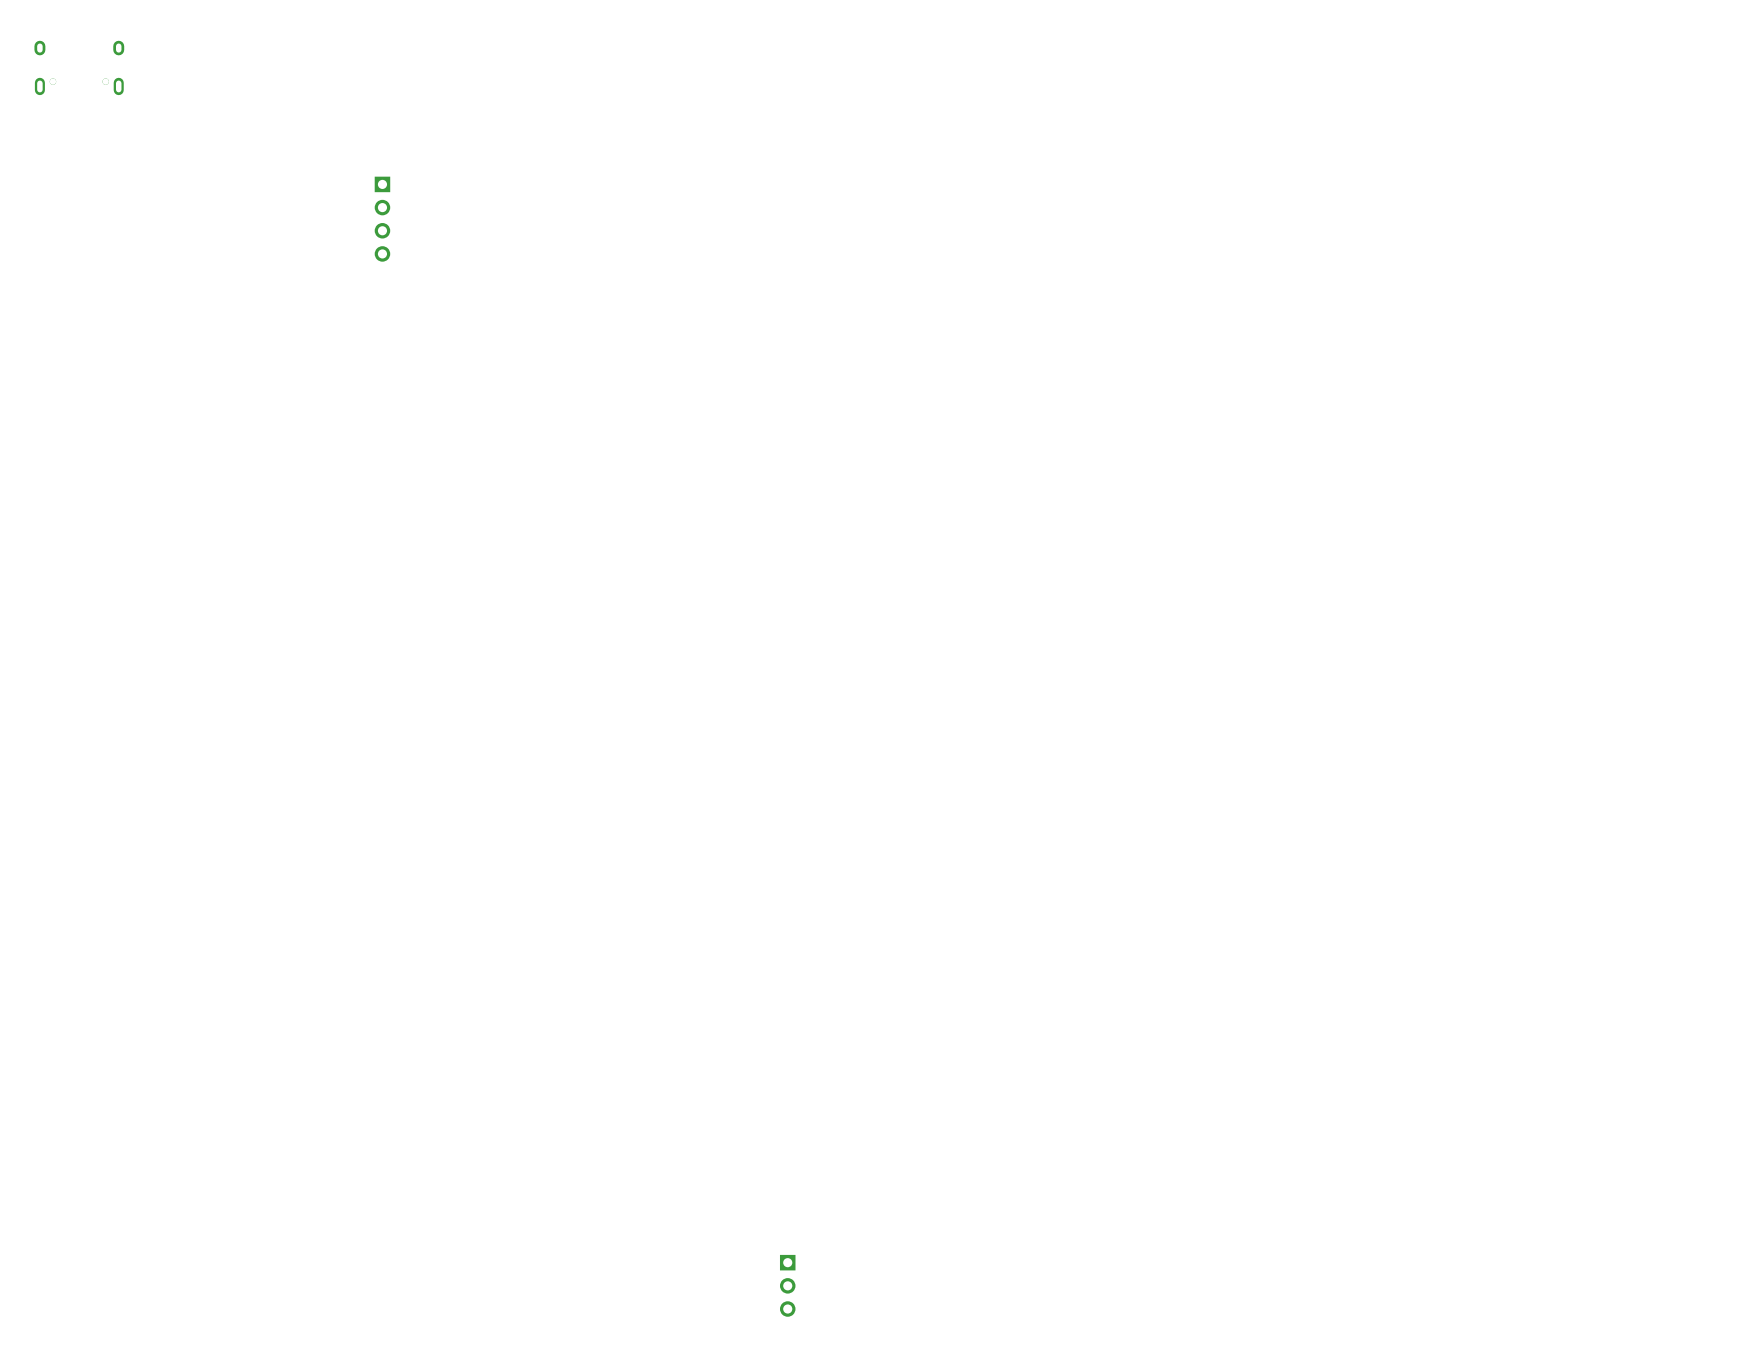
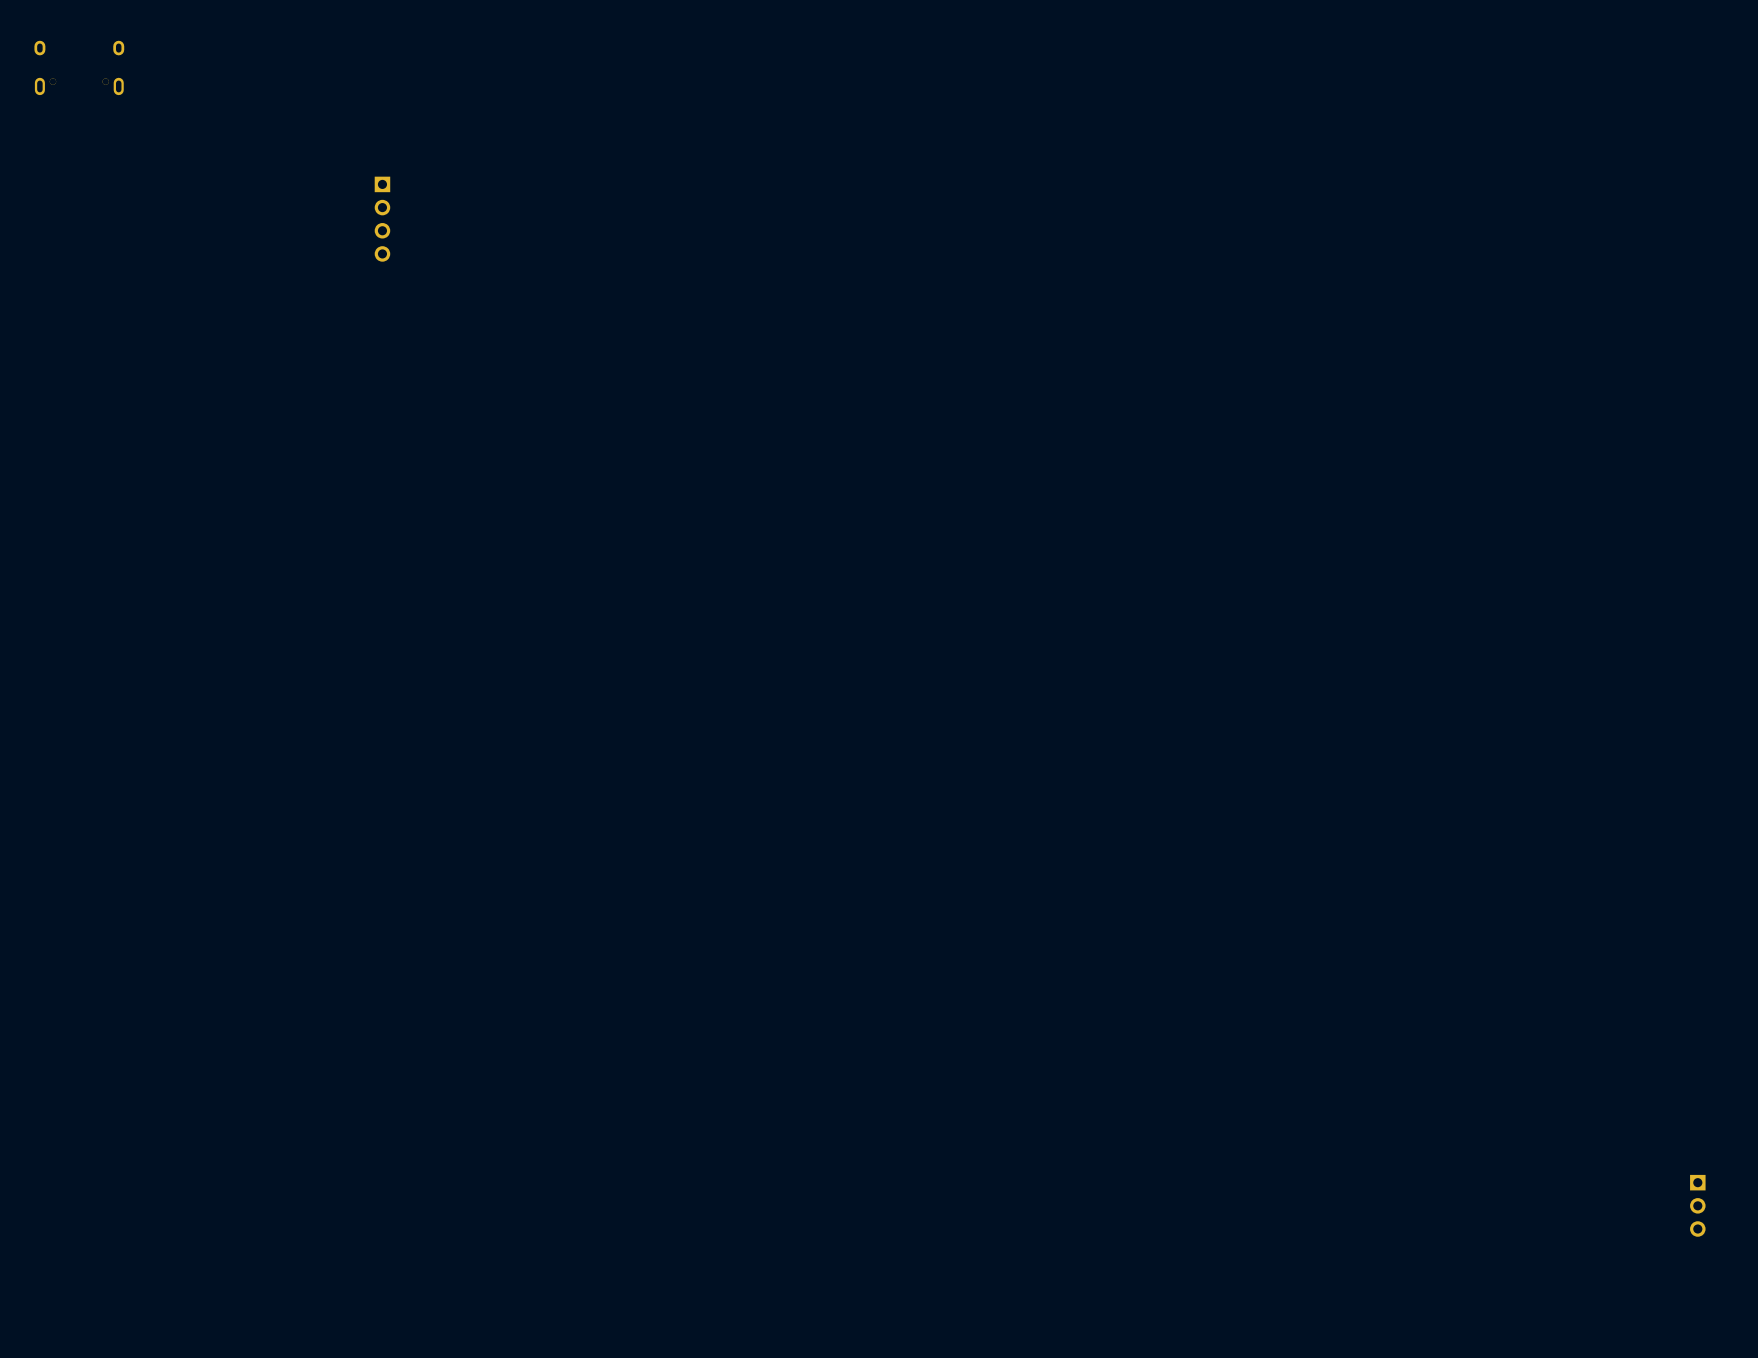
part: none -> (1697, 1205)
part: (787, 1285) -> none

